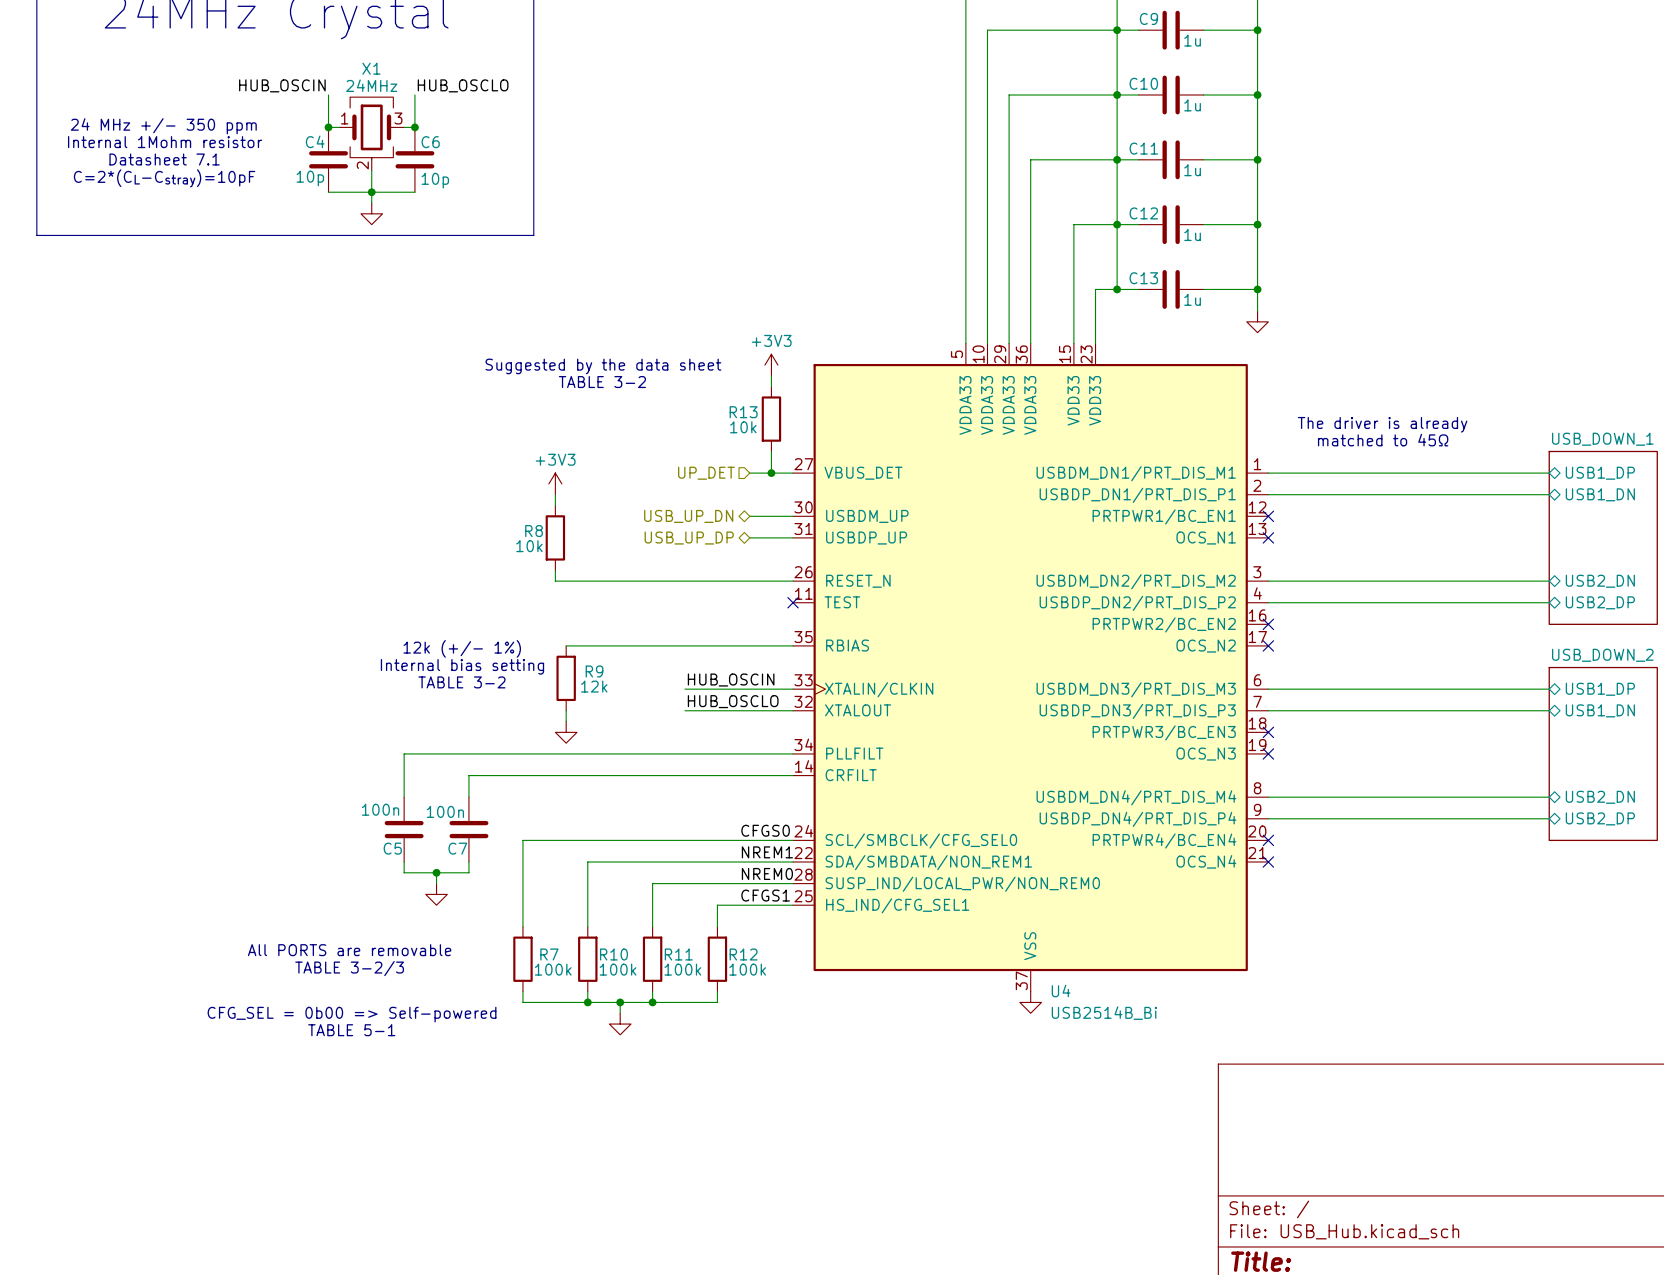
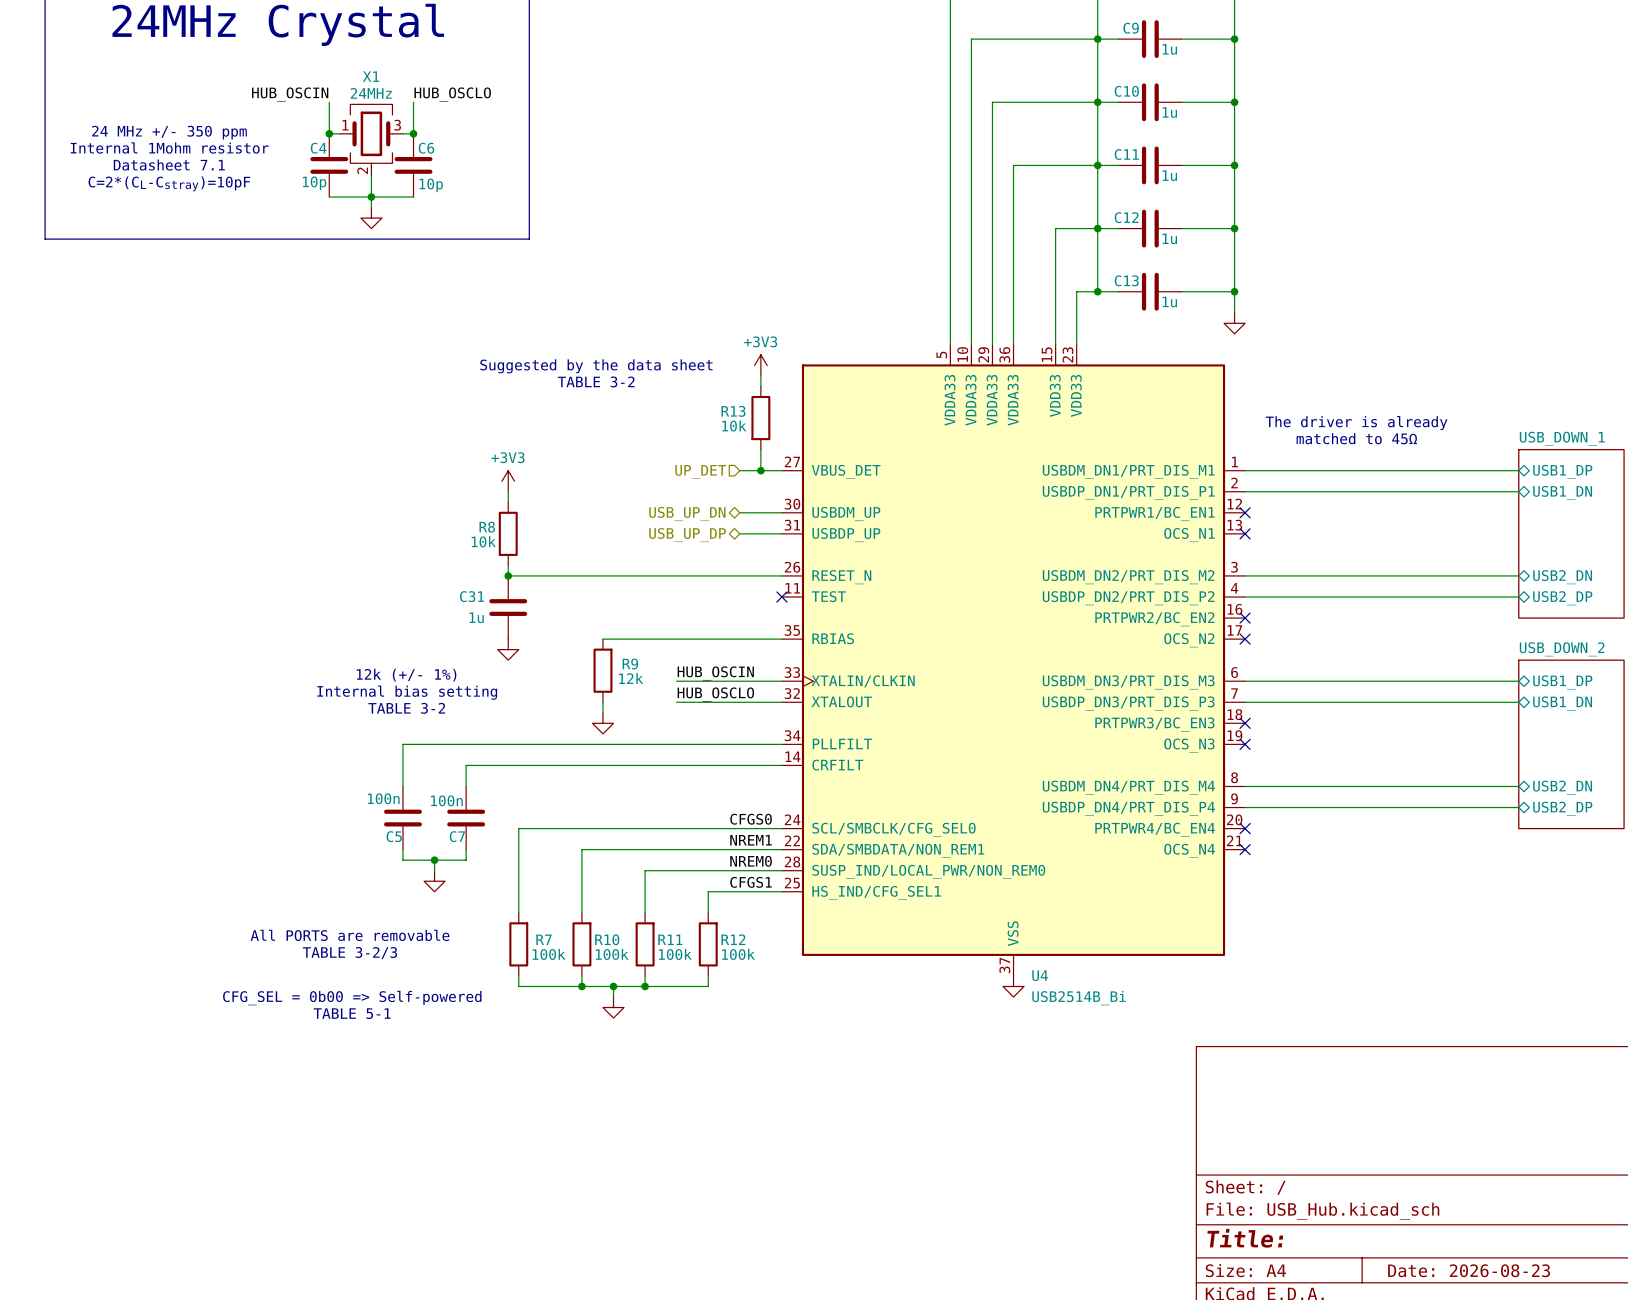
power symbol position: +3V3 (555, 483) -> +3V3 (508, 481)
wire: (555, 494) (555, 505) -> (508, 491) (508, 502)
R8 position: (555, 537) -> (508, 533)
wire: (555, 570) (555, 581) -> (508, 565) (508, 575) (550, 575)
junction: none -> (508, 575)
C31: none -> 1u (508, 607)
wire: (566, 645) (609, 645) -> none
text position: 12k (+/- 1%) (462, 648) -> 12k (+/- 1%) (406, 675)
power symbol: none -> (508, 649)
text position: Internal bias setting (462, 666) -> Internal bias setting (407, 692)
R9 position: (566, 678) -> (602, 670)
text position: TABLE 3-2 (461, 682) -> TABLE 3-2 (406, 708)
wire: (566, 710) (566, 721) -> (602, 702) (602, 712)
power symbol position: (566, 732) -> (602, 723)

